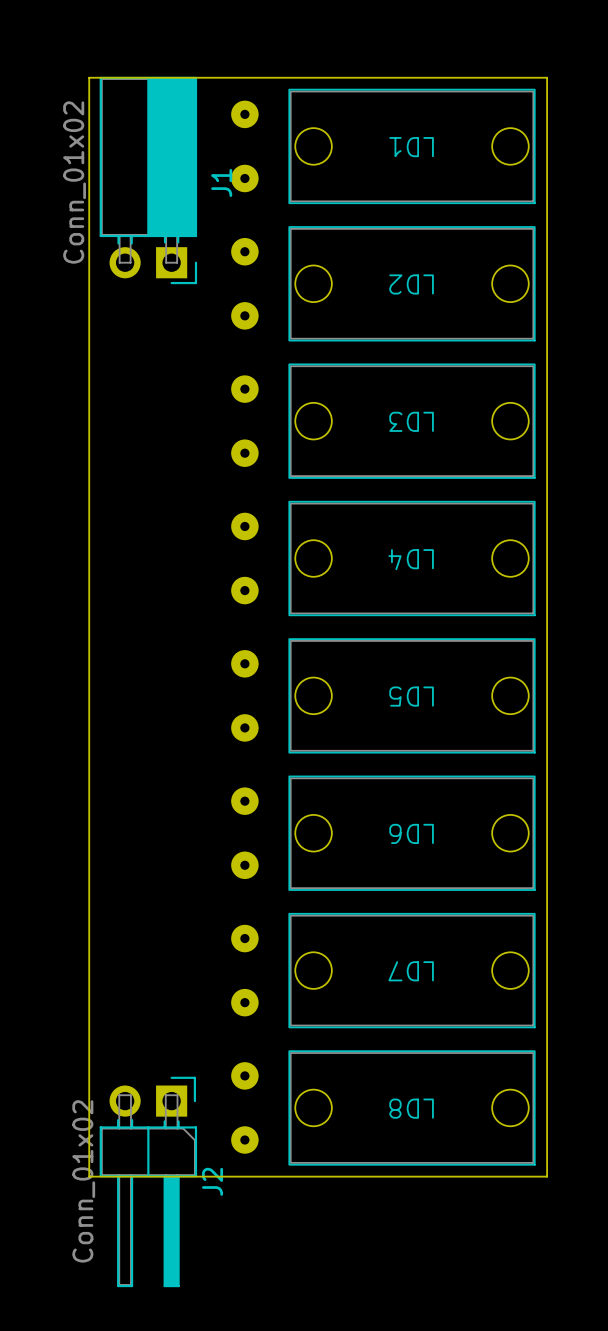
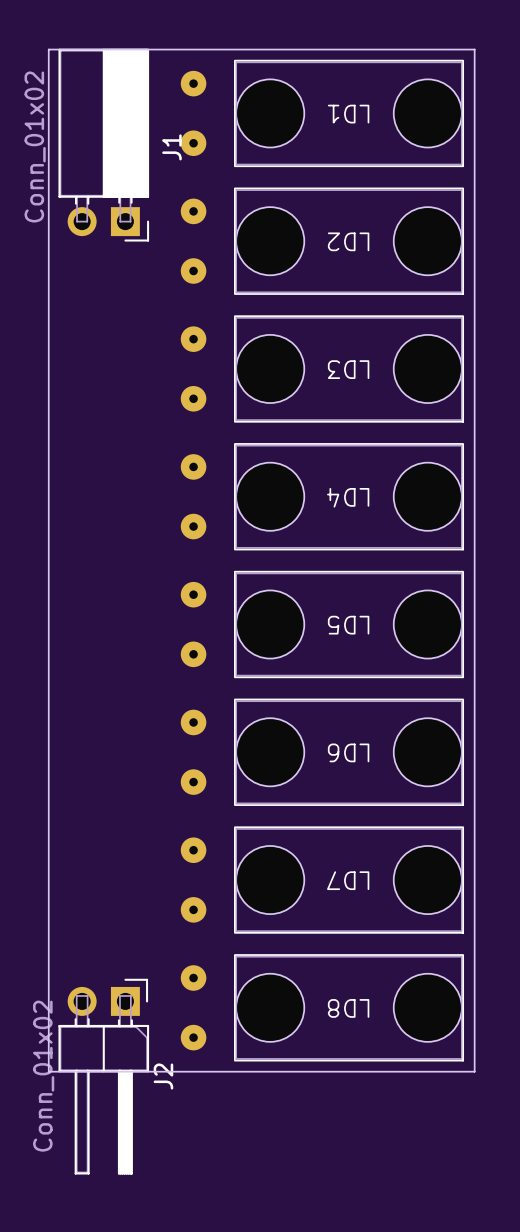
LD1 footprint: [231, 88, 536, 205] -> [180, 59, 465, 168]
LD2 footprint: [231, 226, 536, 342] -> [180, 187, 465, 295]
LD3 footprint: [231, 363, 536, 479] -> [180, 315, 465, 423]
LD4 footprint: [231, 500, 536, 617] -> [180, 443, 465, 551]
LD5 footprint: [231, 638, 536, 754] -> [180, 570, 465, 679]
LD6 footprint: [231, 775, 536, 891] -> [180, 698, 465, 806]
LD7 footprint: [231, 912, 536, 1029] -> [180, 826, 465, 934]
LD8 footprint: [231, 1050, 536, 1166] -> [180, 954, 465, 1062]

